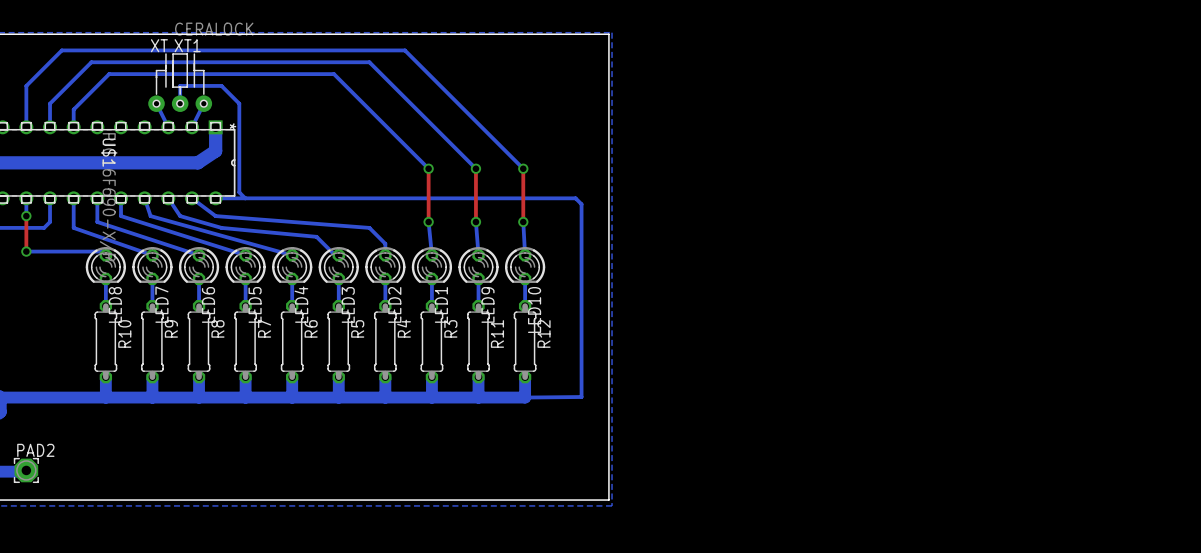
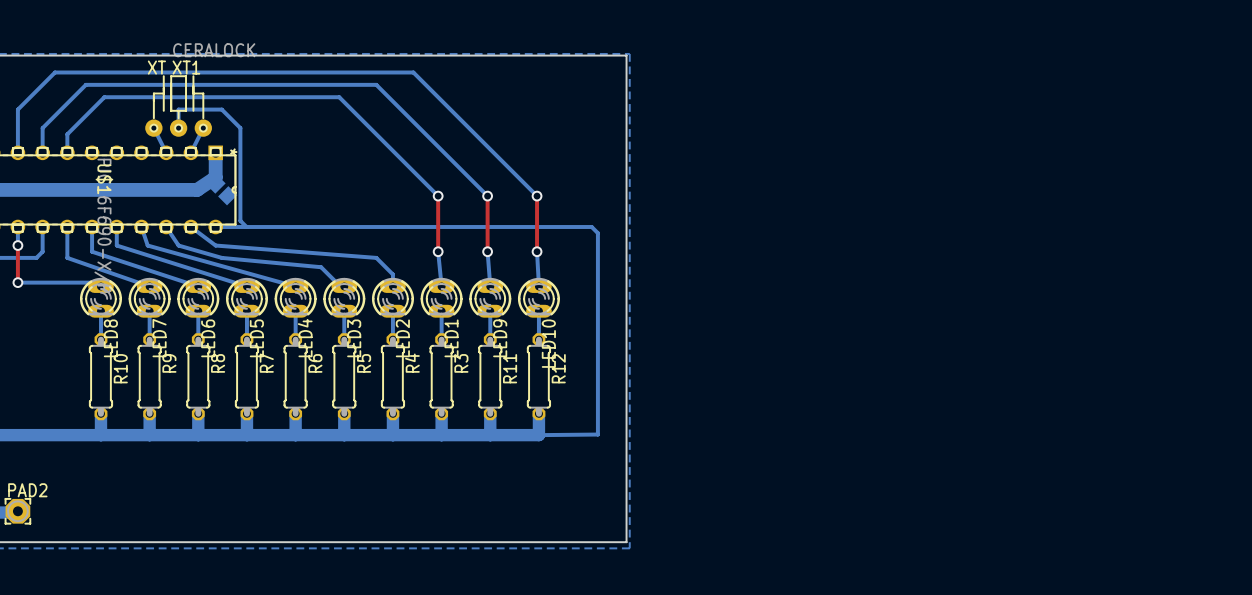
part: none -> (221, 189)
LED8 footprint: [85, 247, 126, 286] -> [79, 277, 122, 318]
LED7 footprint: [132, 247, 173, 286] -> [128, 277, 171, 318]
LED6 footprint: [178, 247, 220, 286] -> [177, 277, 220, 318]
LED5 footprint: [225, 247, 266, 286] -> [225, 277, 268, 318]
LED4 footprint: [272, 247, 313, 286] -> [274, 277, 317, 318]
LED3 footprint: [318, 247, 359, 286] -> [323, 277, 366, 318]
LED2 footprint: [365, 247, 406, 286] -> [371, 277, 414, 318]
LED1 footprint: [411, 247, 453, 286] -> [420, 277, 463, 318]
LED9 footprint: [458, 247, 499, 286] -> [469, 277, 512, 318]
LED10 footprint: [504, 247, 546, 286] -> [517, 277, 560, 318]

